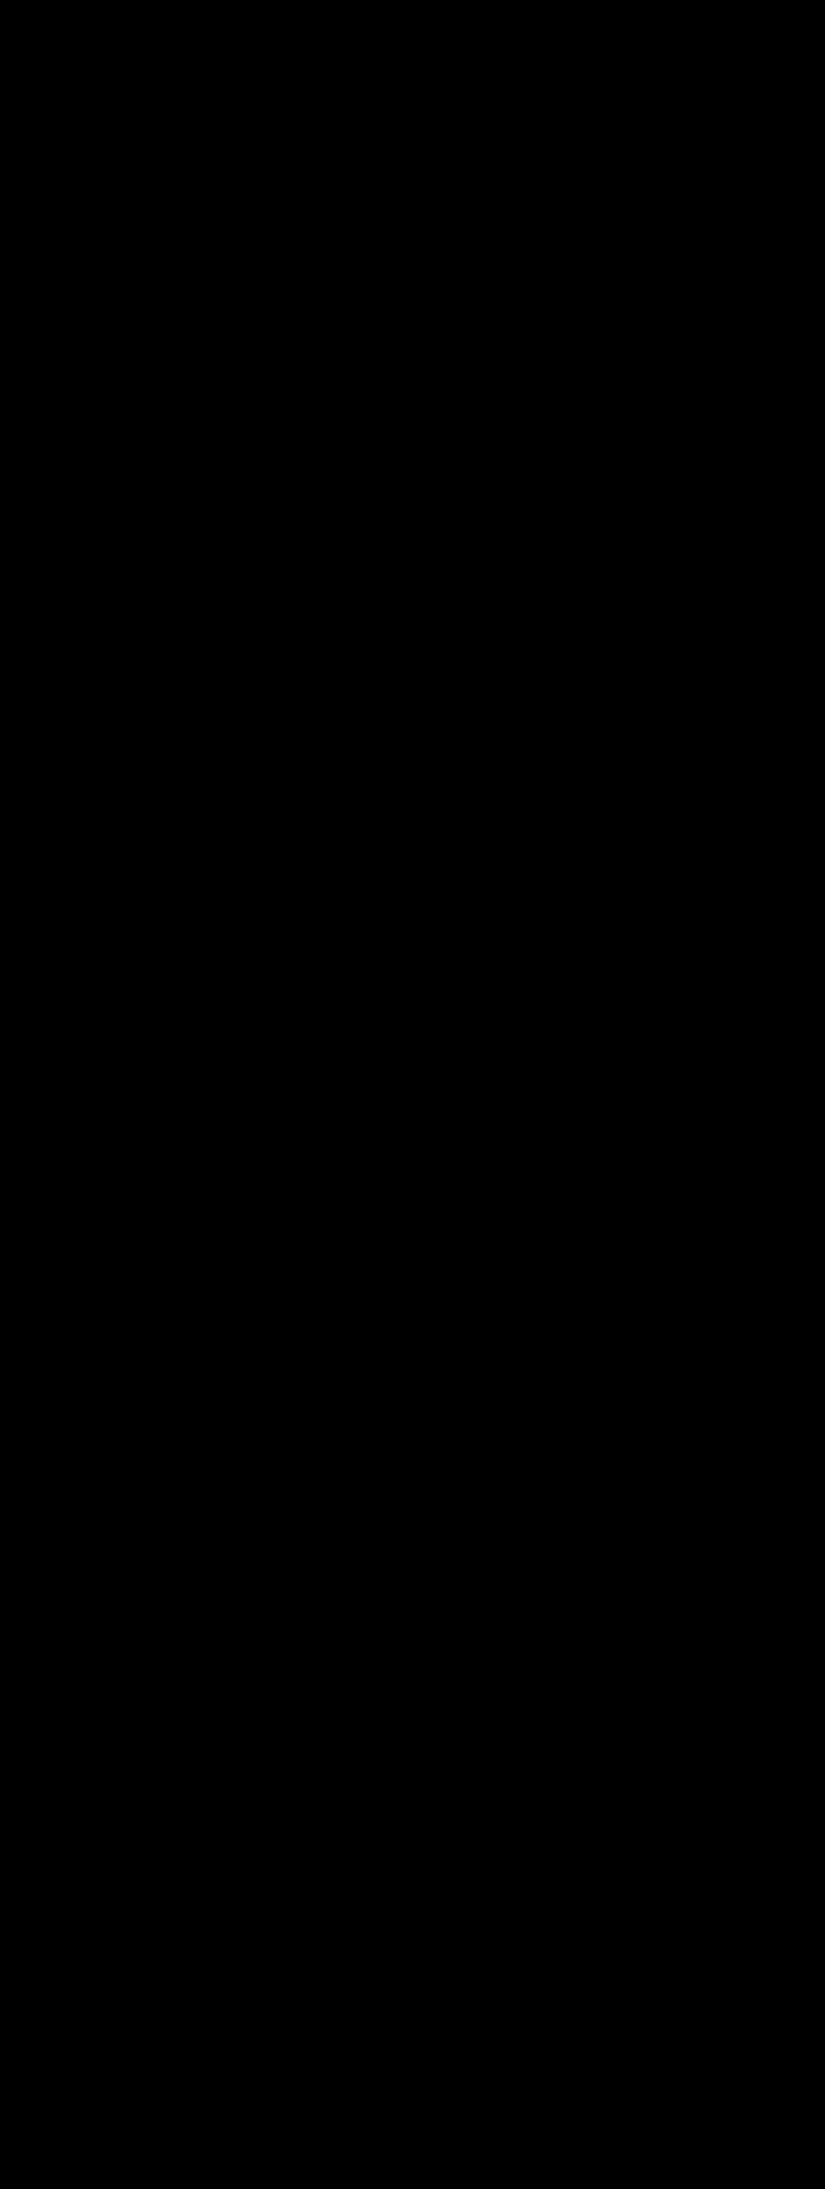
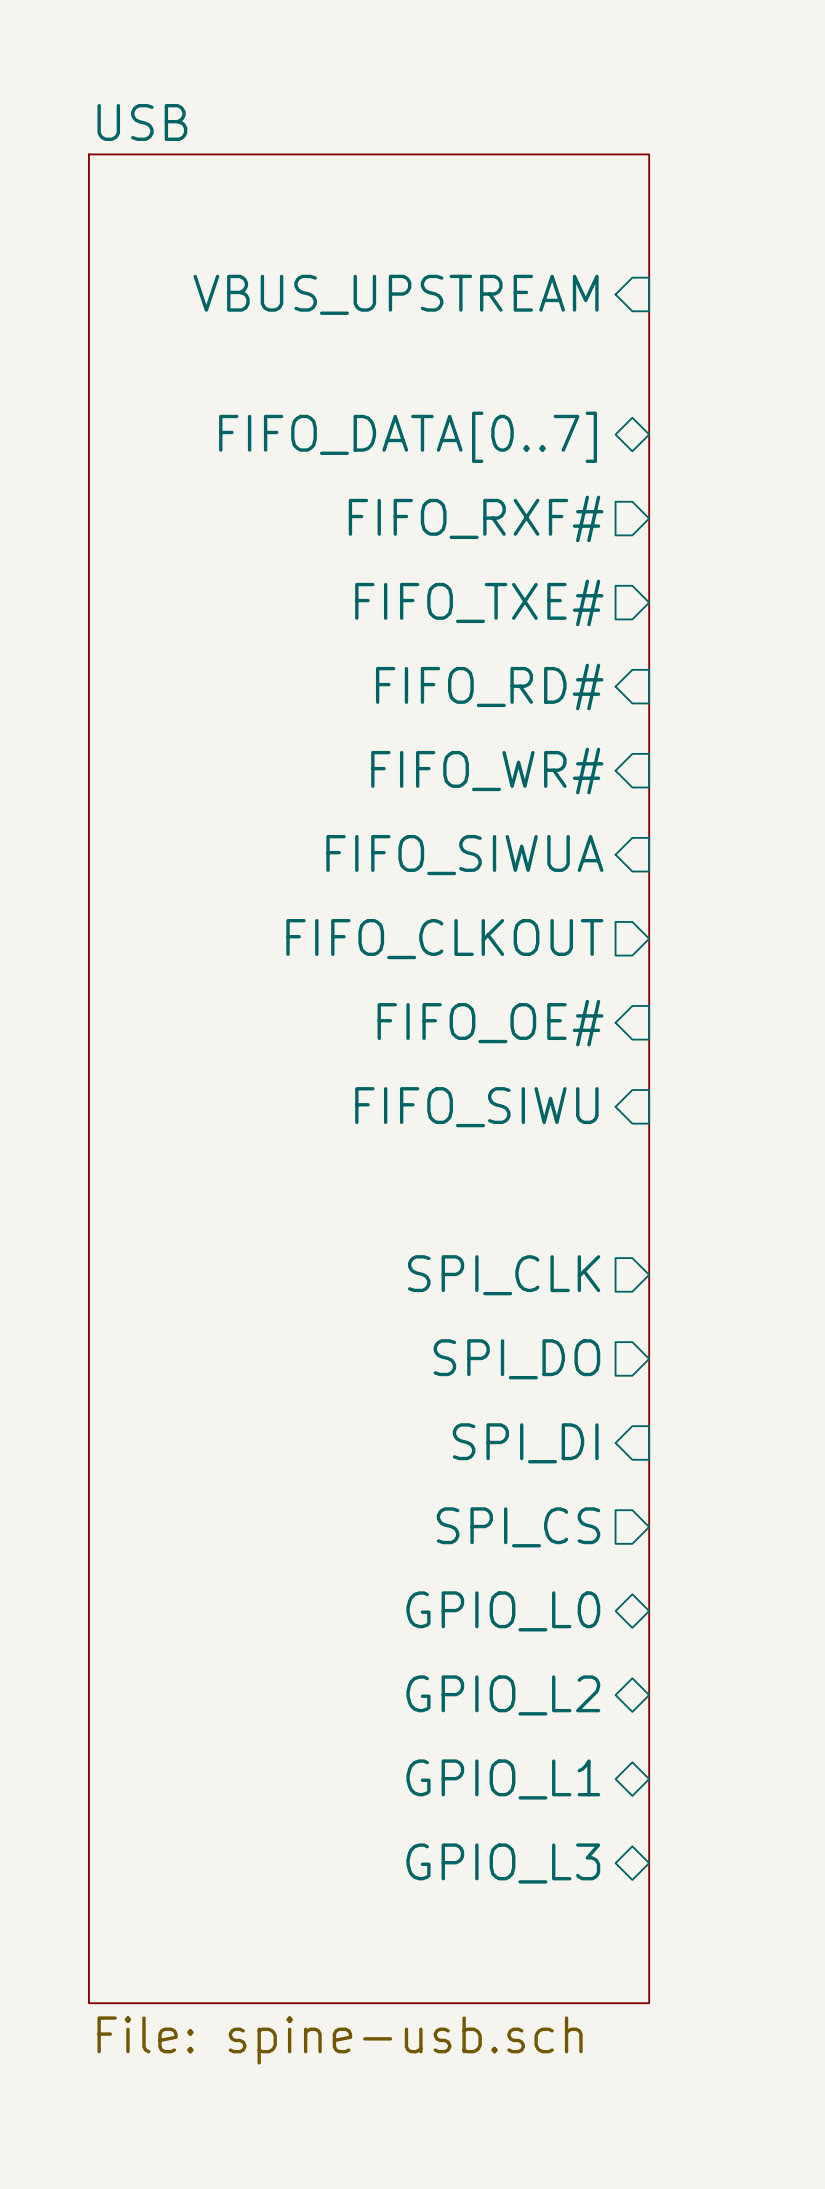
sheet pin: none -> VBUS_UPSTREAM (396, 294)
sheet pin: none -> FIFO_DATA[0..7] (408, 437)
sheet pin: none -> FIFO_RXF# (476, 518)
sheet pin: none -> FIFO_TXE# (479, 602)
sheet pin: none -> FIFO_RD# (489, 686)
sheet pin: none -> FIFO_WR# (487, 771)
sheet pin: none -> FIFO_SIWUA (464, 855)
sheet pin: none -> FIFO_CLKOUT (444, 939)
sheet pin: none -> FIFO_OE# (490, 1023)
sheet USB: none -> File: spine-usb.sch (369, 1078)
sheet pin: none -> FIFO_SIWU (476, 1107)
sheet pin: none -> SPI_CLK (504, 1275)
sheet pin: none -> SPI_DO (516, 1359)
sheet pin: none -> SPI_DI (525, 1443)
sheet pin: none -> SPI_CS (518, 1527)
sheet pin: none -> GPIO_L0 (503, 1611)
sheet pin: none -> GPIO_L2 (503, 1695)
sheet pin: none -> GPIO_L1 (503, 1779)
sheet pin: none -> GPIO_L3 (503, 1863)

